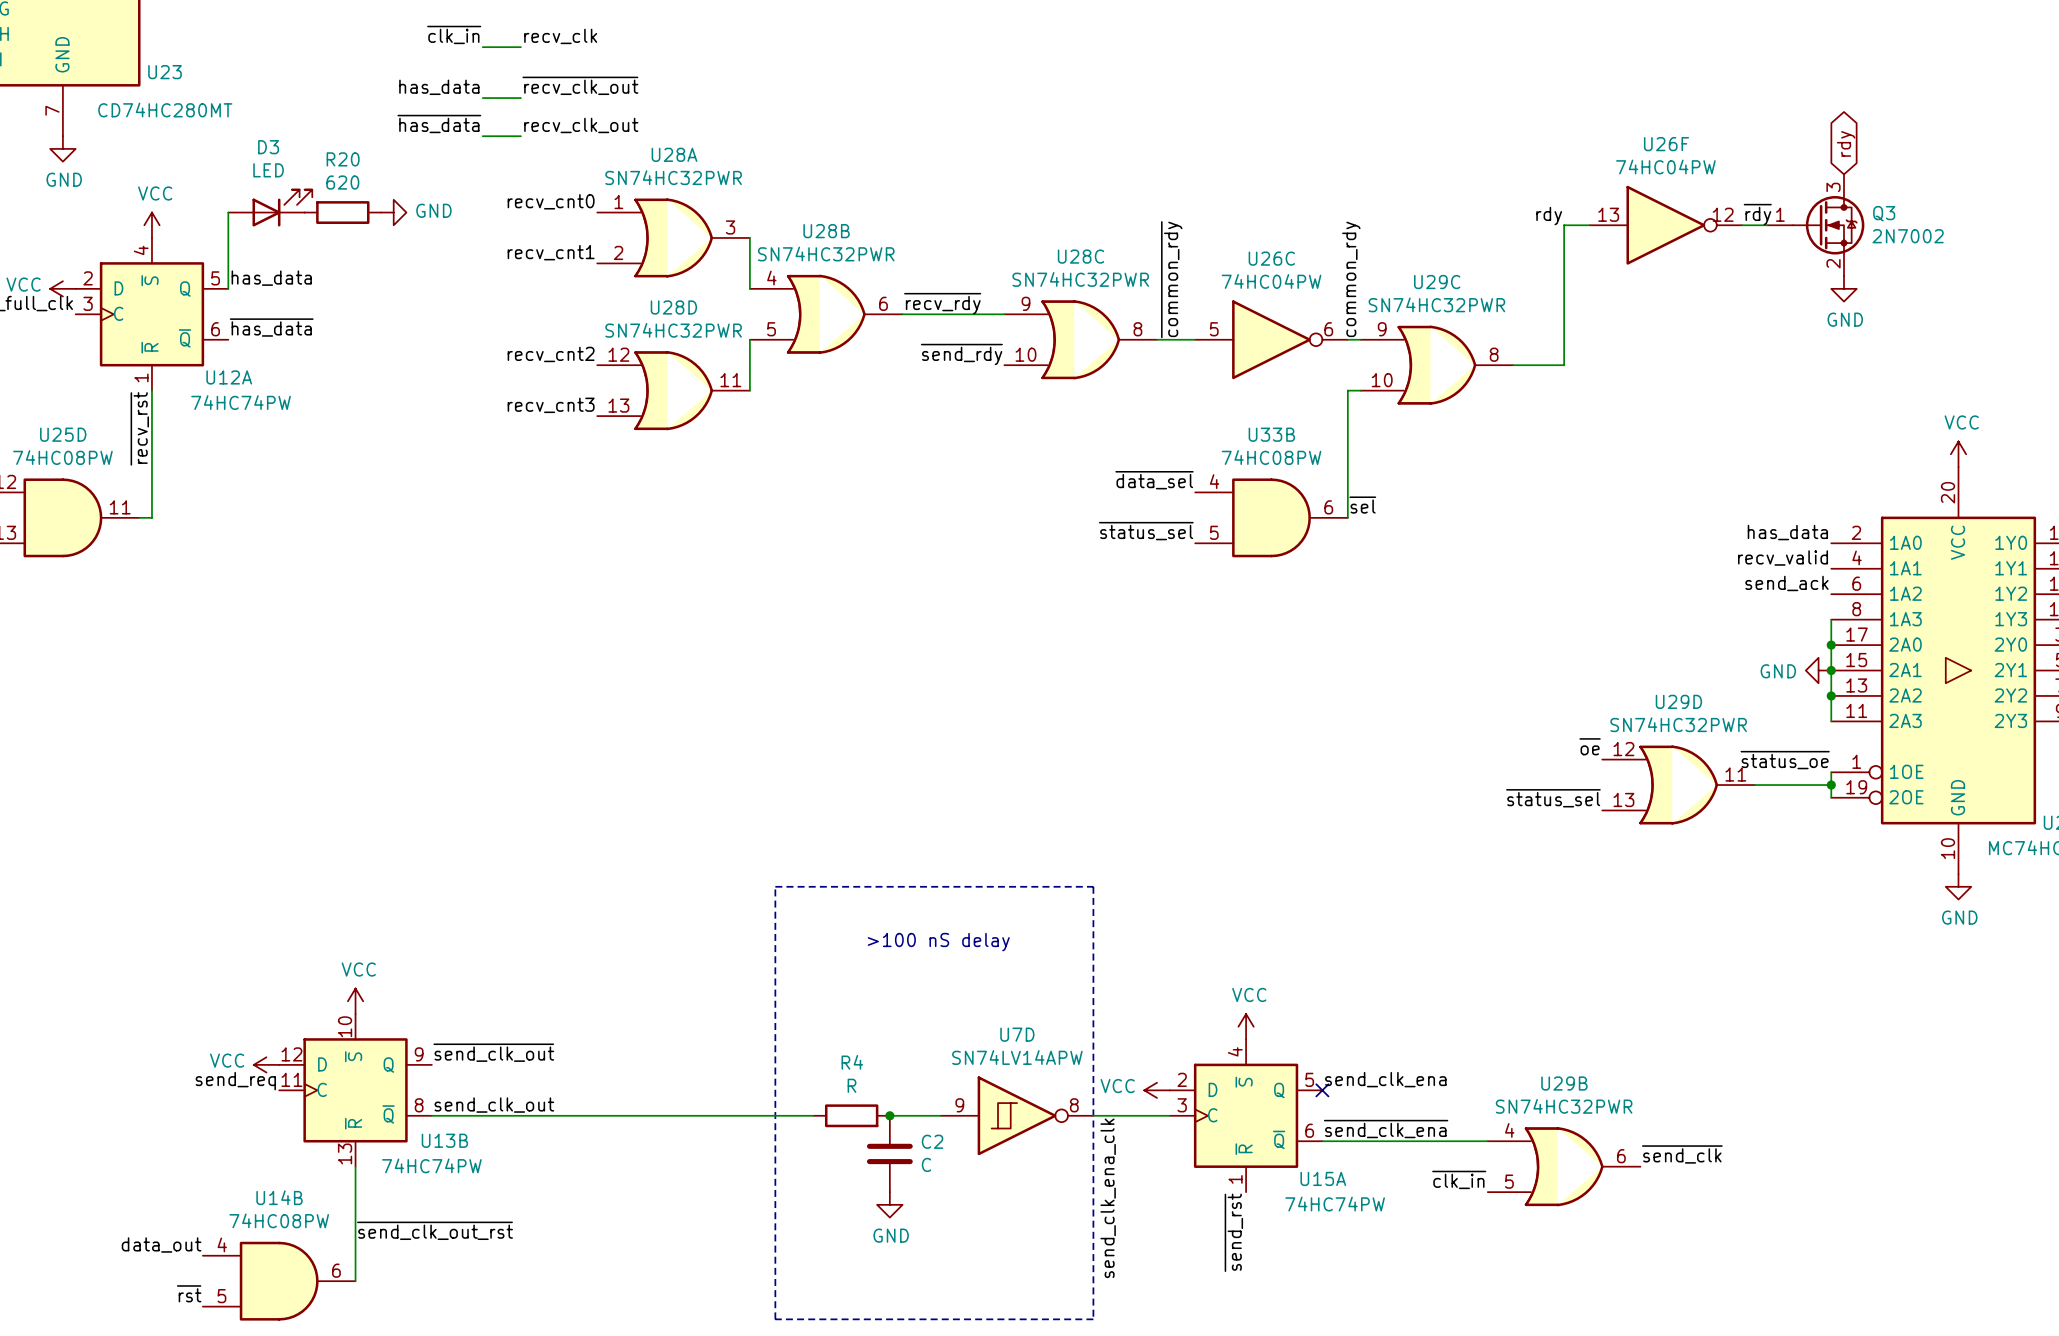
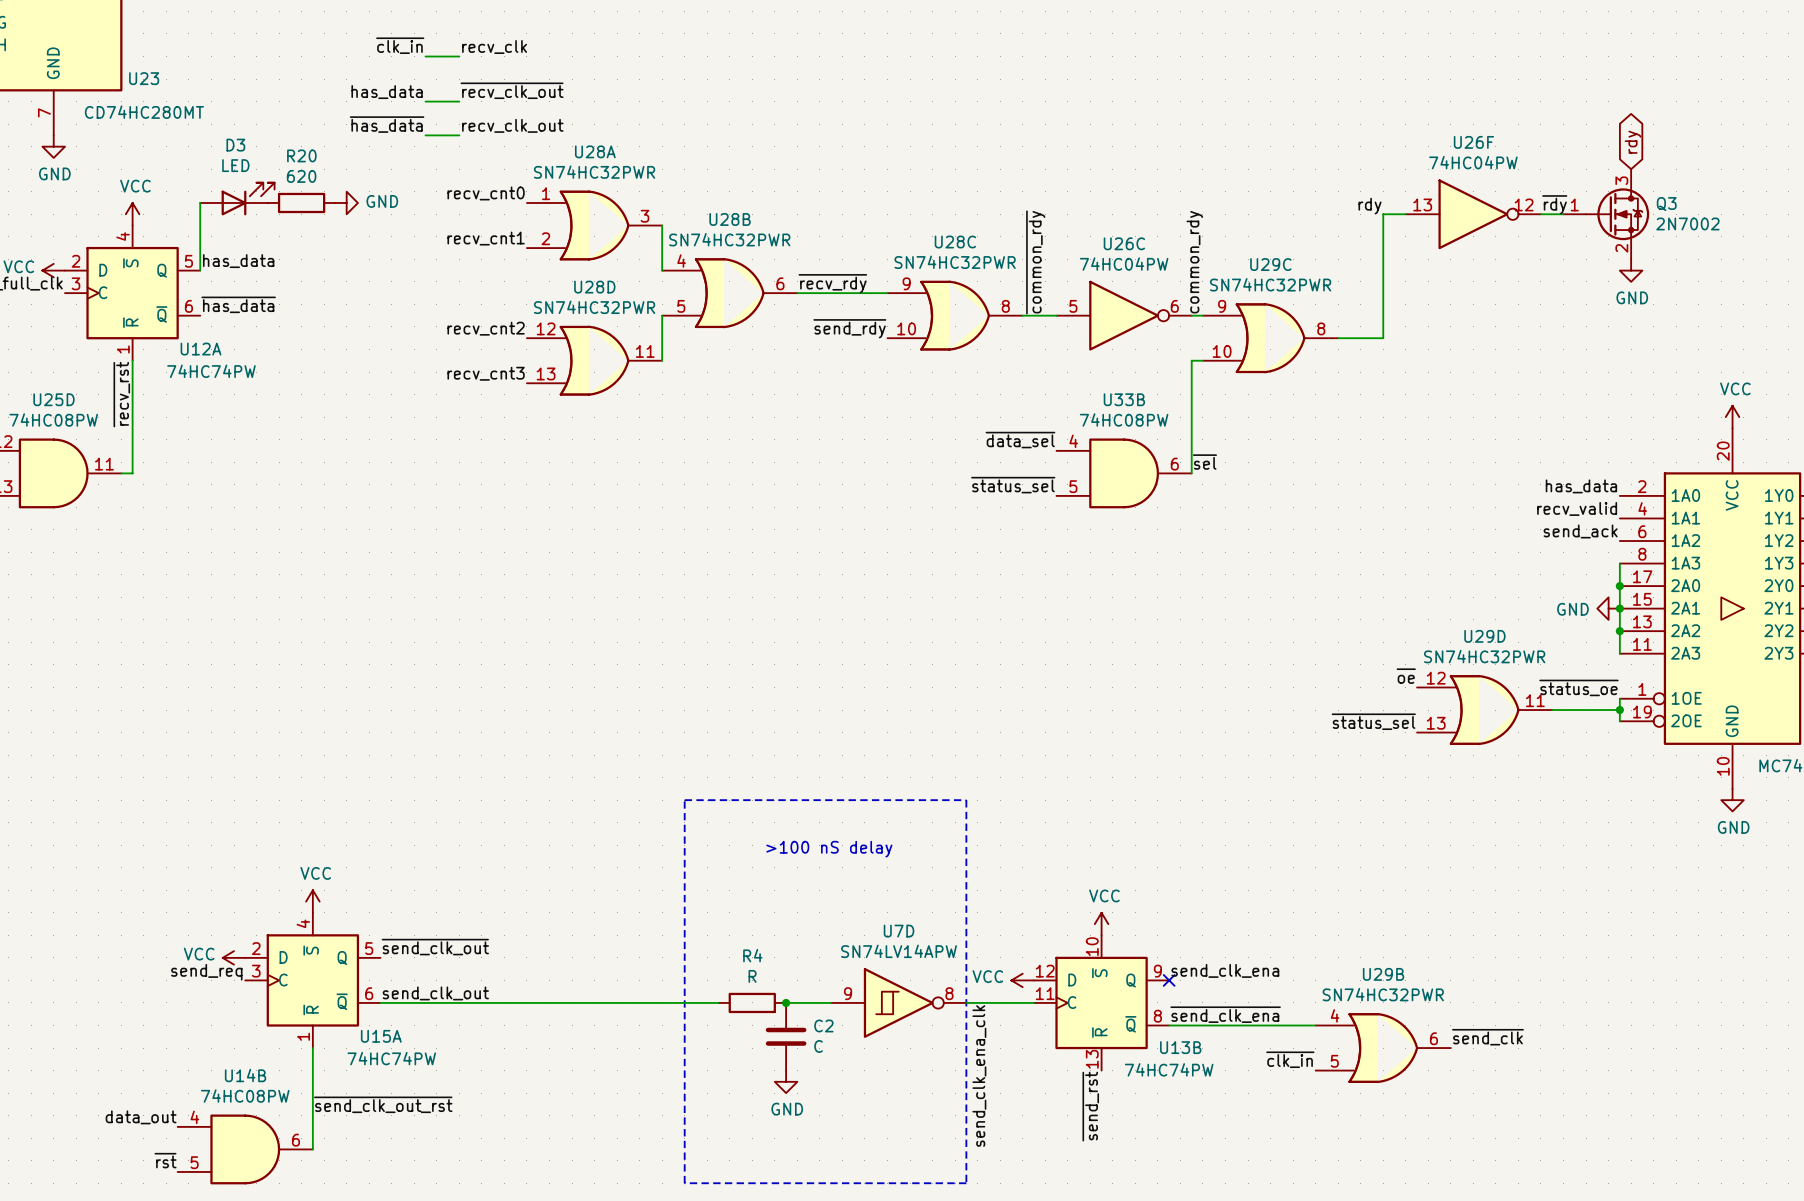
U13B position: (355, 1090) -> (1101, 1002)
U15A position: (1246, 1115) -> (312, 980)

